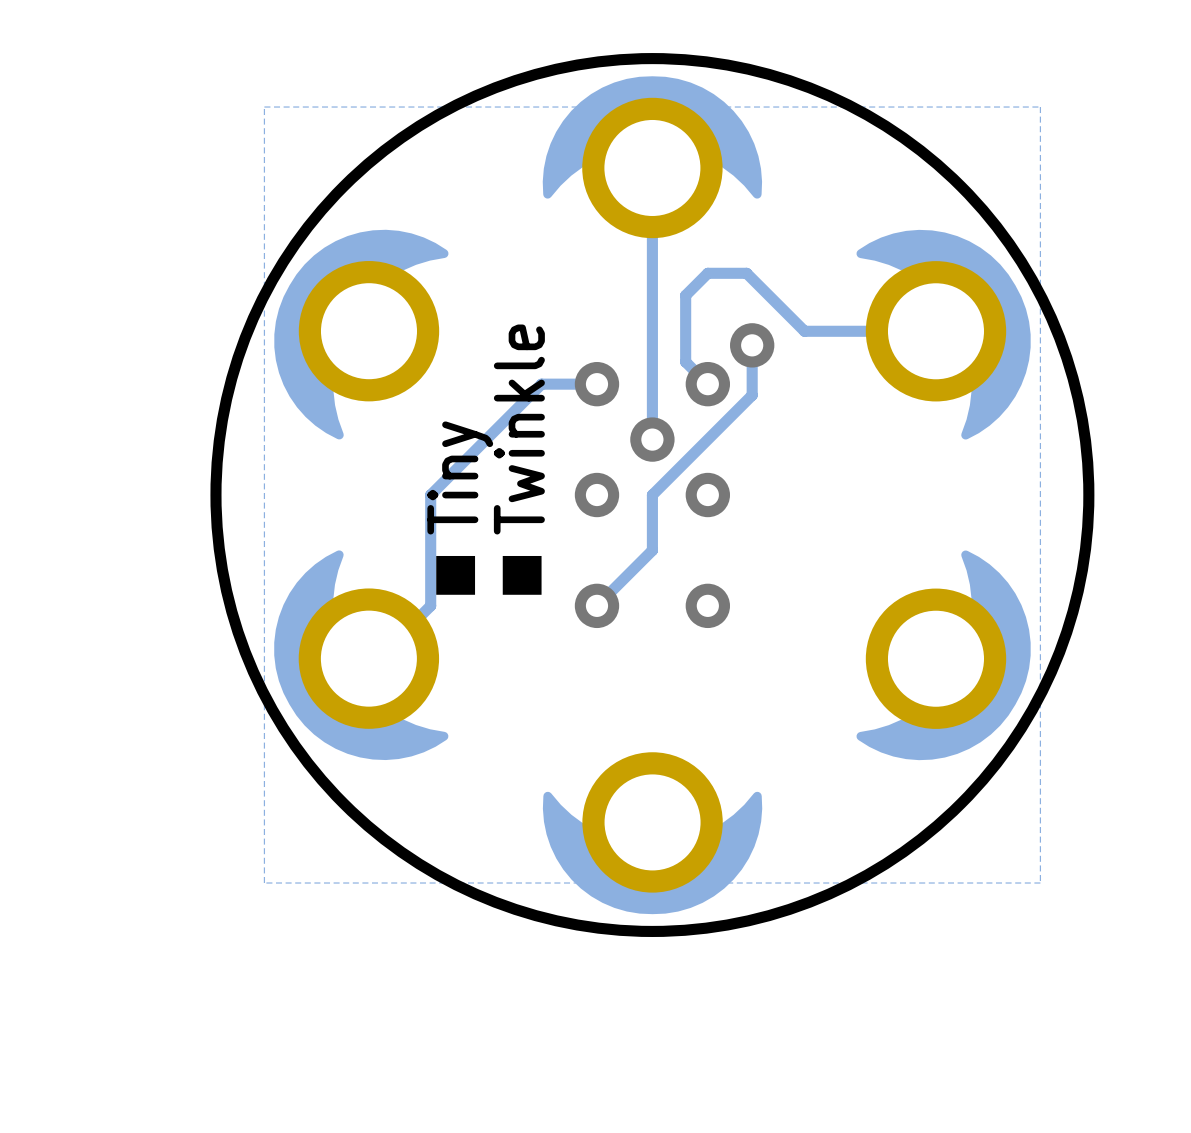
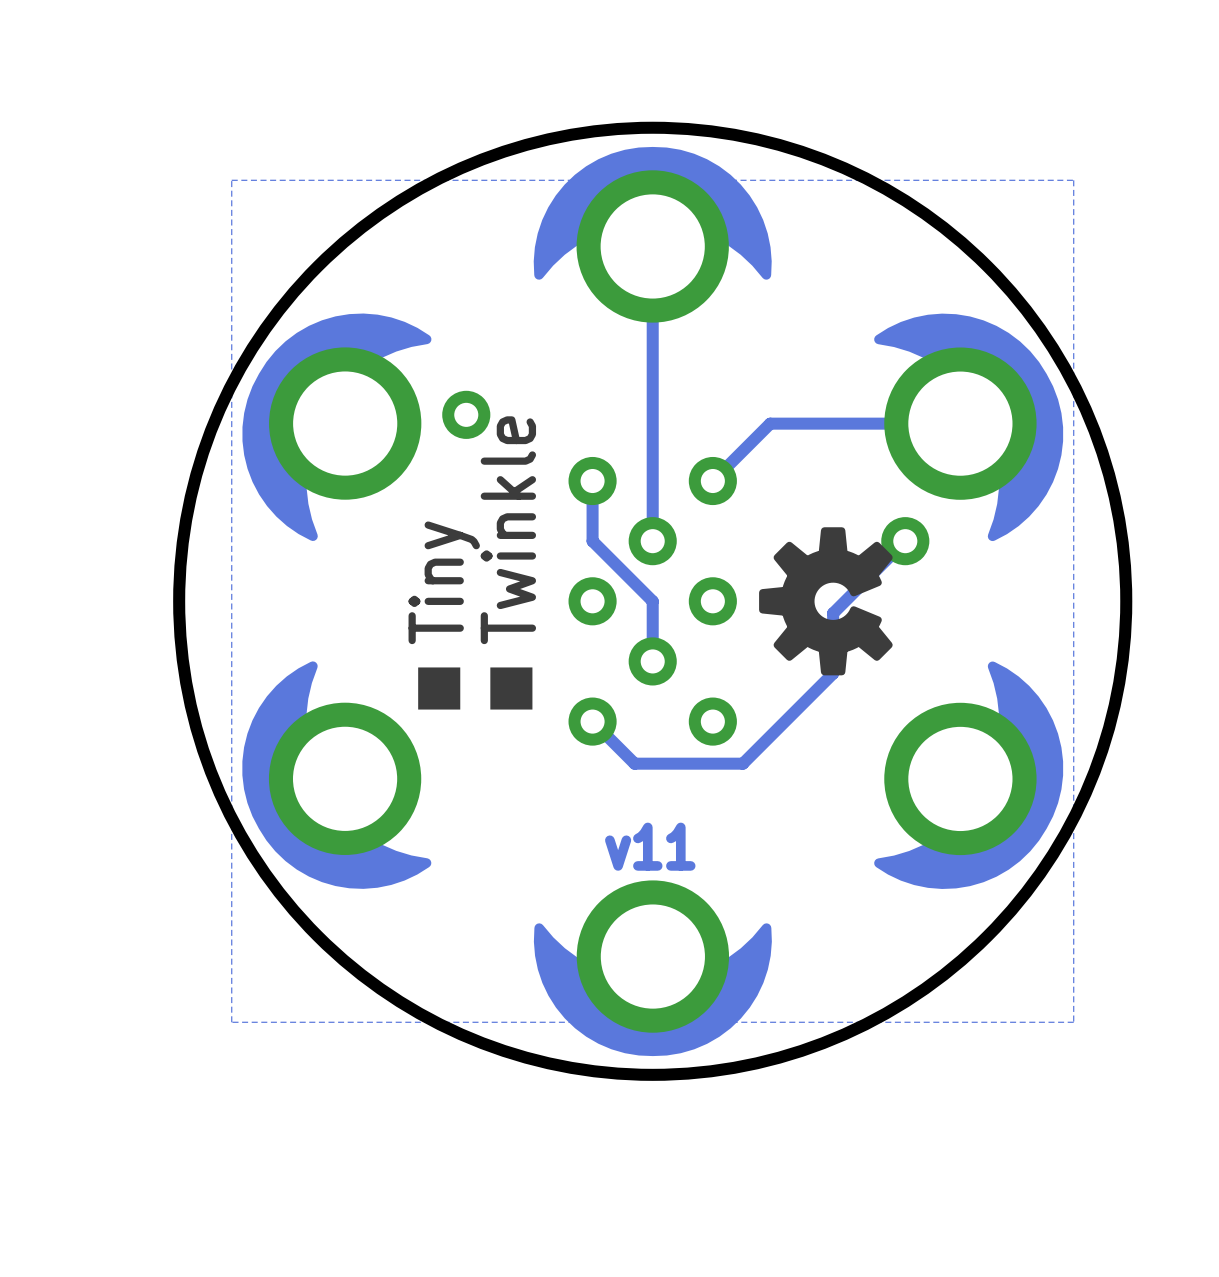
via: none -> (466, 414)
track: (804, 331) (746, 273) (707, 273) (685, 295) (685, 361) (707, 384) -> (817, 423) (770, 423) (712, 481)
track: (752, 345) (752, 395) (652, 495) -> (592, 481) (592, 541) (652, 601)
via: (752, 345) -> none
track: (596, 384) (541, 384) (430, 495) (430, 605) (377, 658) -> none
drawing: none -> [759, 527, 893, 676]
via: none -> (905, 541)
track: (652, 550) (596, 605) -> (905, 541) (833, 613) (833, 673) (742, 763) (634, 763) (592, 721)
via: none -> (652, 661)
text: none -> v11 (650, 846)

